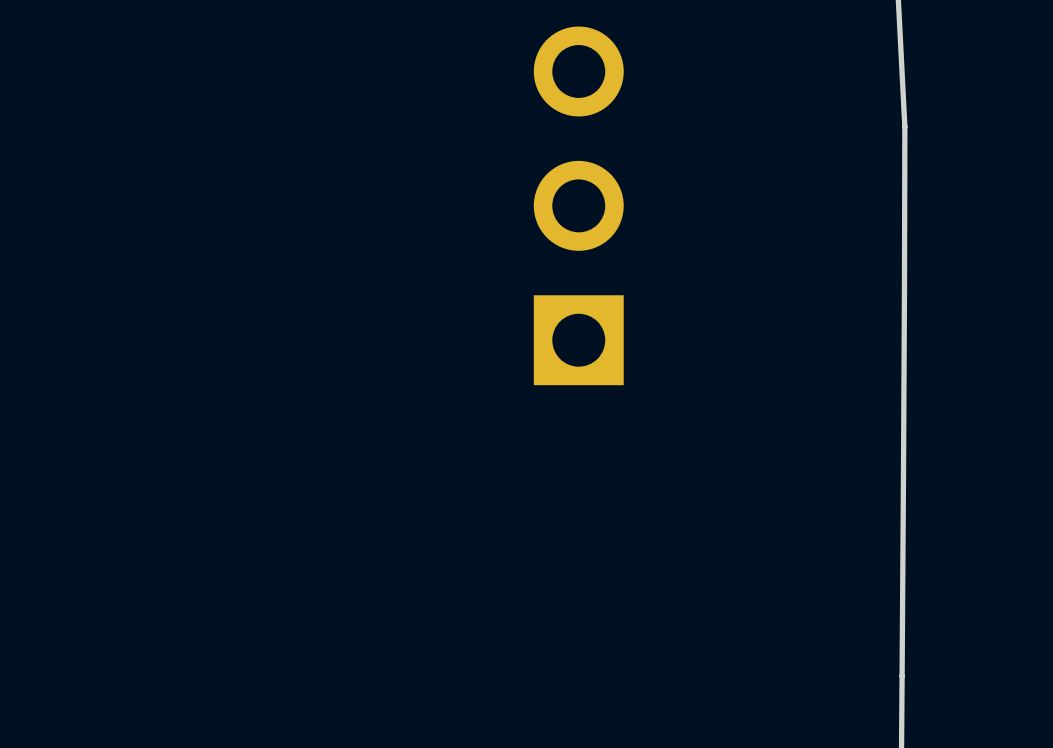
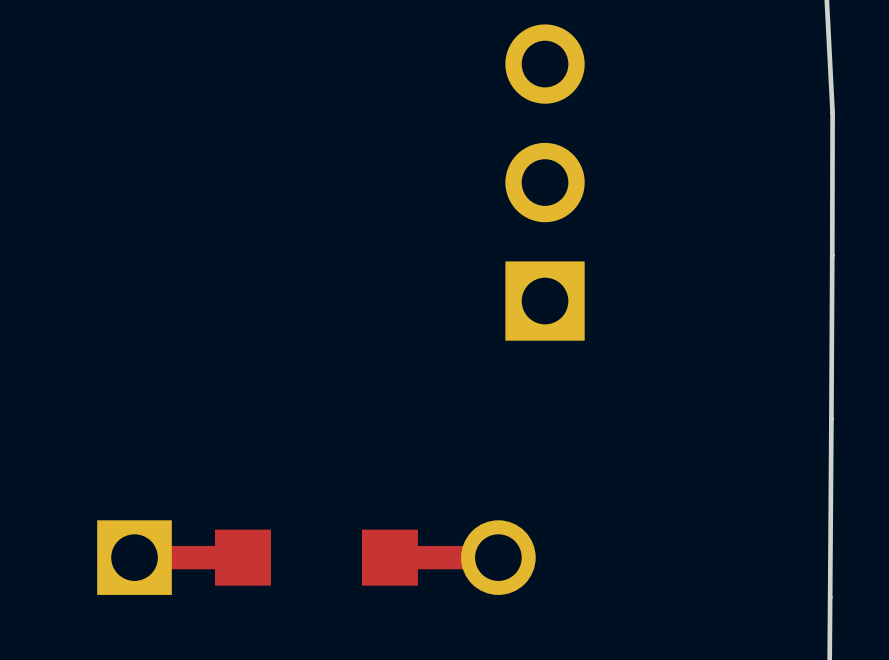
part: none -> (316, 557)

